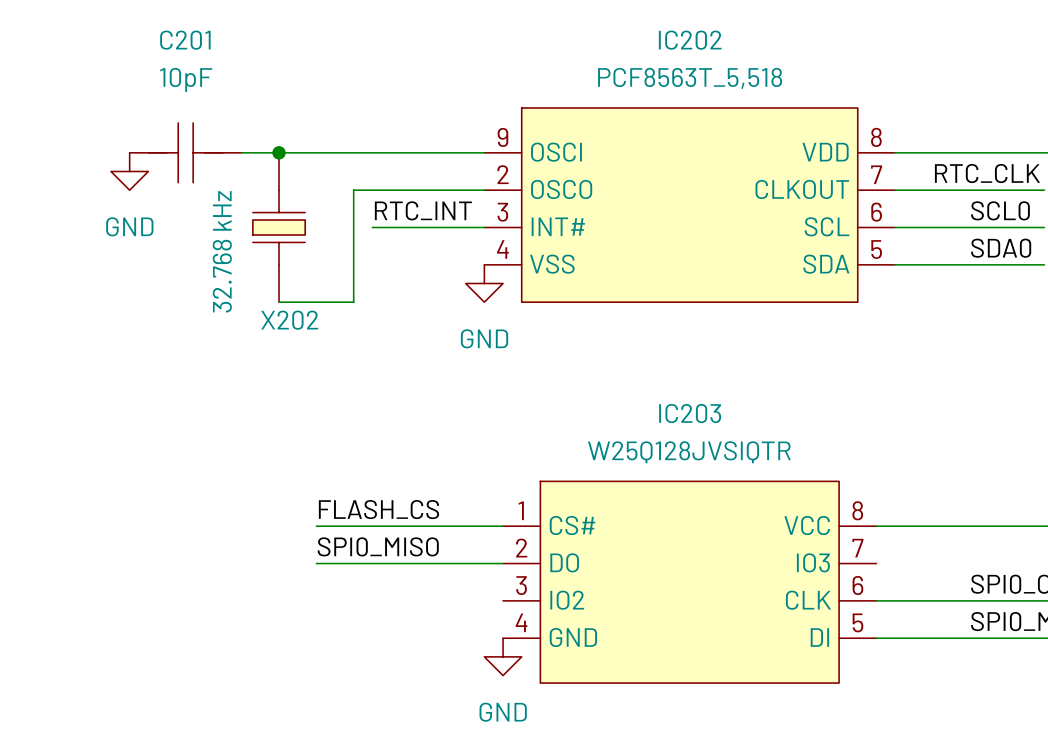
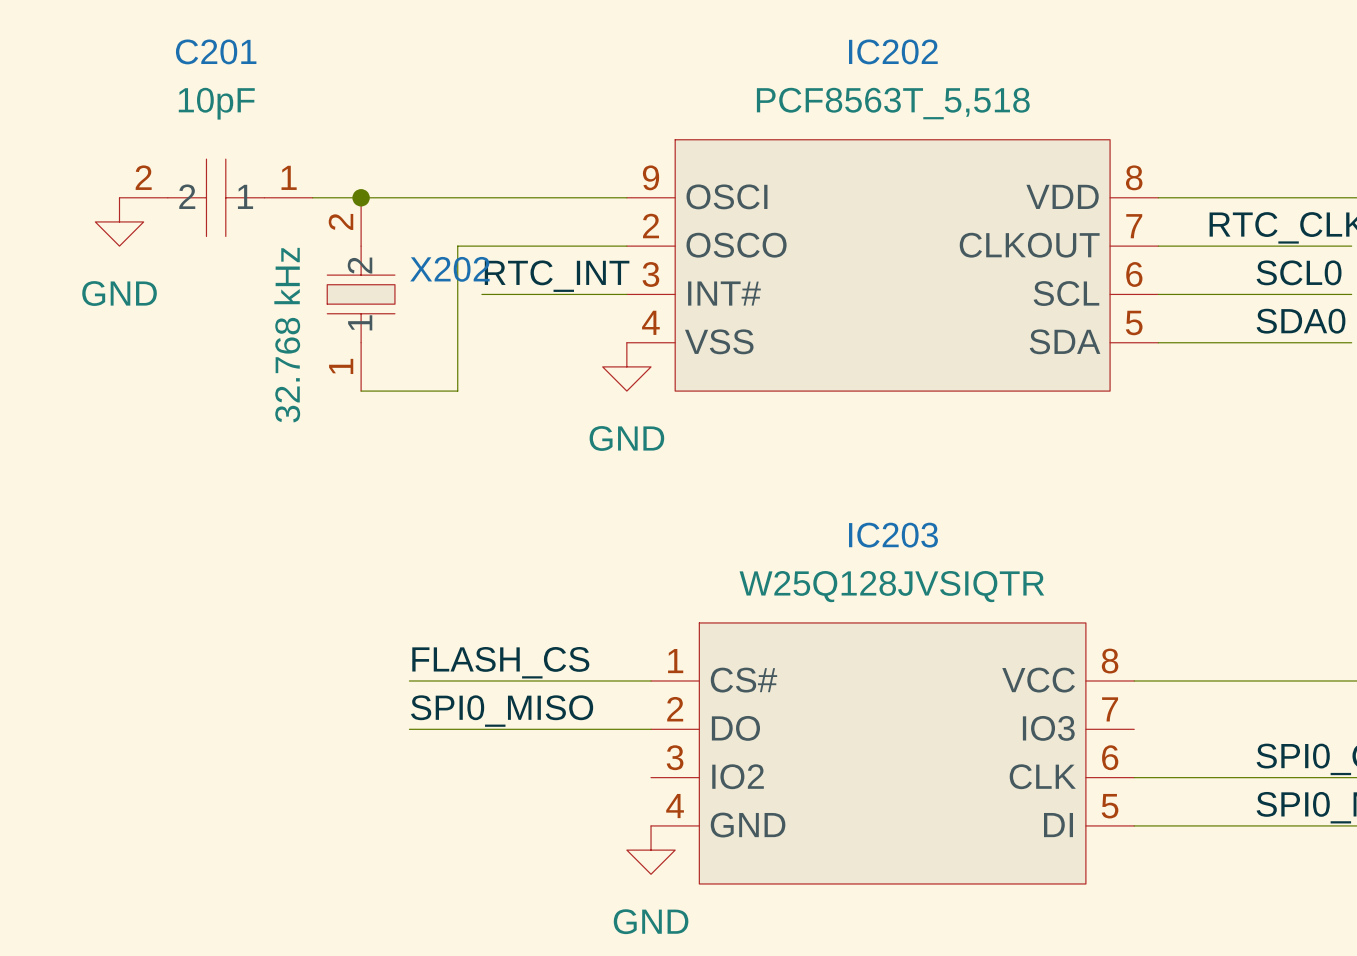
C201 symbol: [129, 122, 242, 183] -> [119, 159, 313, 237]
power symbol position: GND (129, 171) -> GND (119, 221)
X202 pin number: none -> 2 (340, 221)
X202 pin name: none -> 2 (360, 265)
X202 pin name: none -> 1 (360, 322)
X202 pin number: none -> 1 (341, 366)
X202 name position: X202 (289, 320) -> X202 (449, 269)

